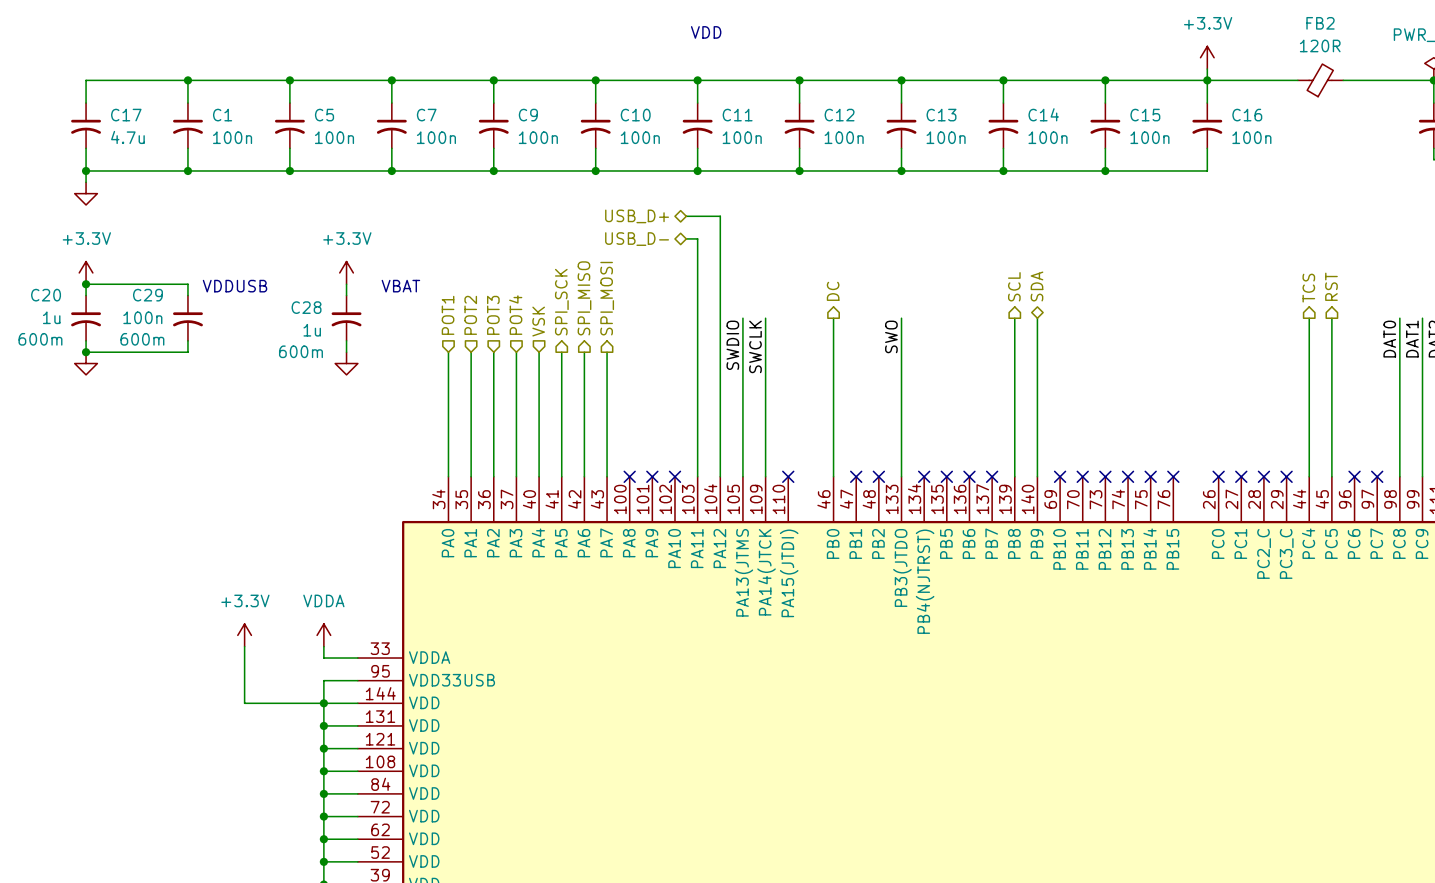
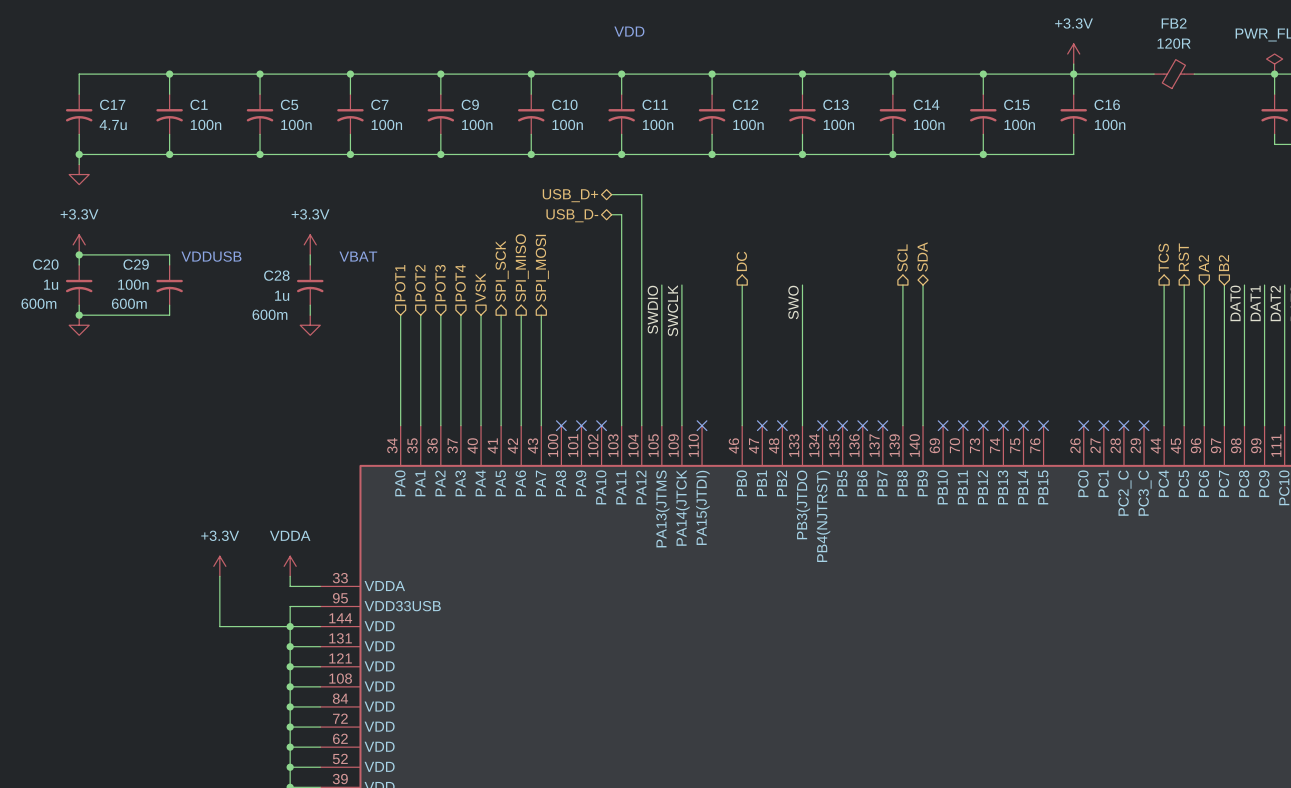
hierarchical label: none -> B2 (1223, 263)
hierarchical label: none -> A2 (1203, 263)
wire: none -> (1204, 285) (1204, 425)
wire: none -> (1224, 285) (1224, 425)
no-connect mark: (1354, 476) -> none
no-connect mark: (1377, 476) -> none

